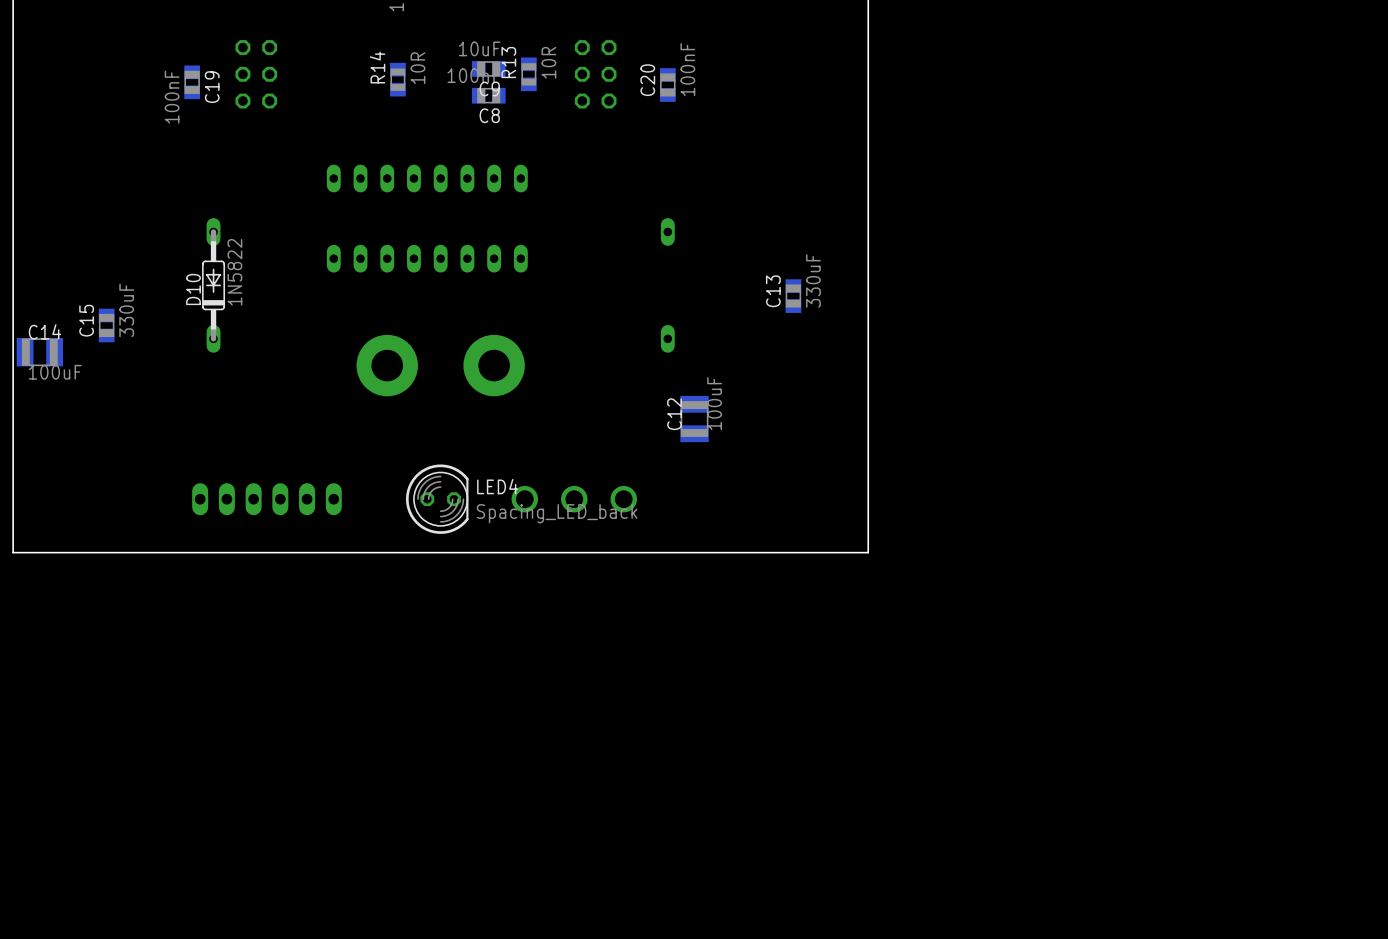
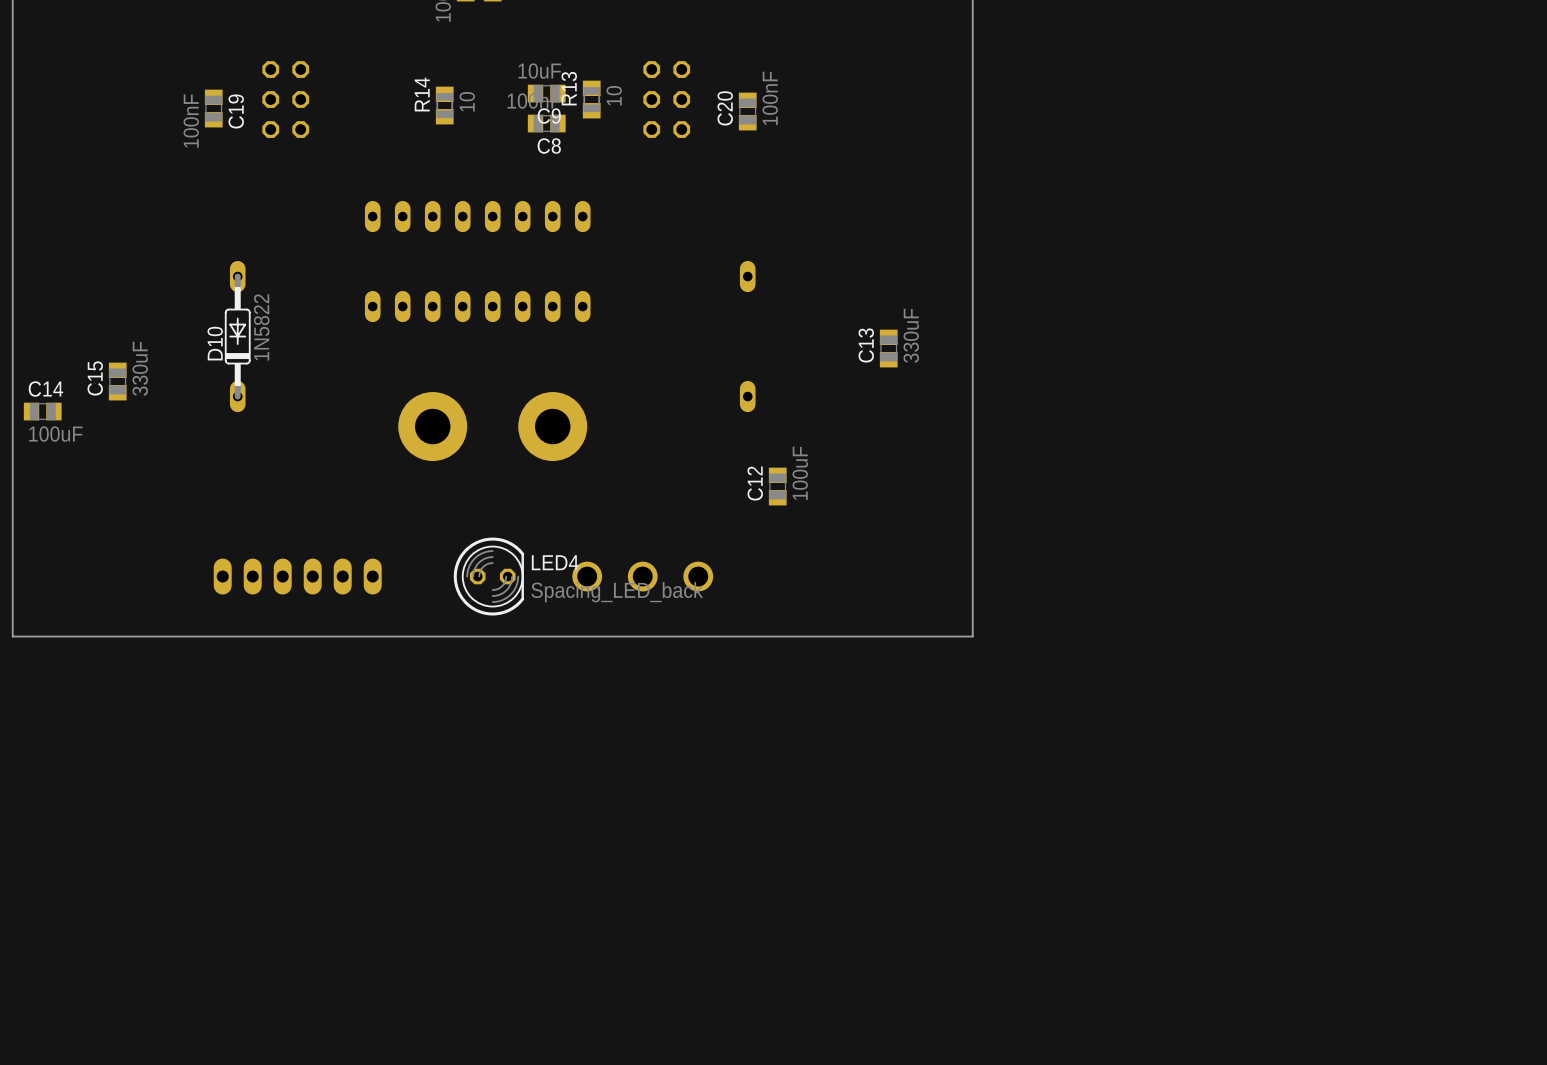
R13 value: 10R (548, 62) -> 10 (614, 95)
R14 value: 10R (417, 68) -> 10 (467, 101)
C14 footprint: [16, 338, 63, 367] -> [23, 402, 62, 421]
C12 footprint: [680, 395, 709, 443] -> [768, 467, 787, 506]

